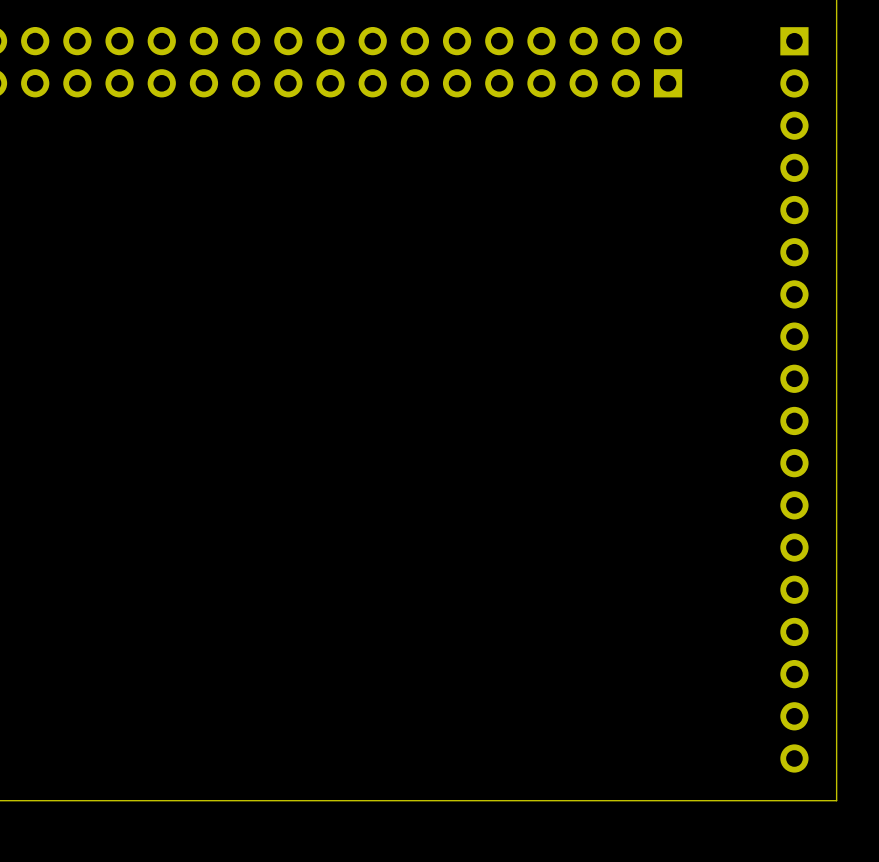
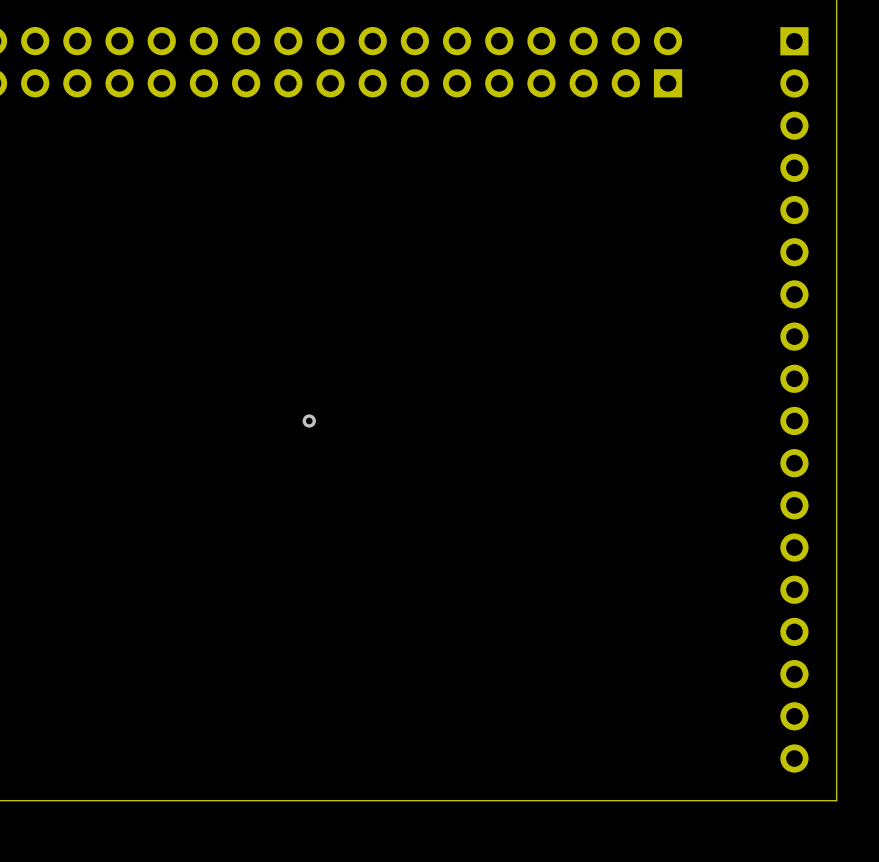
via: none -> (309, 420)

